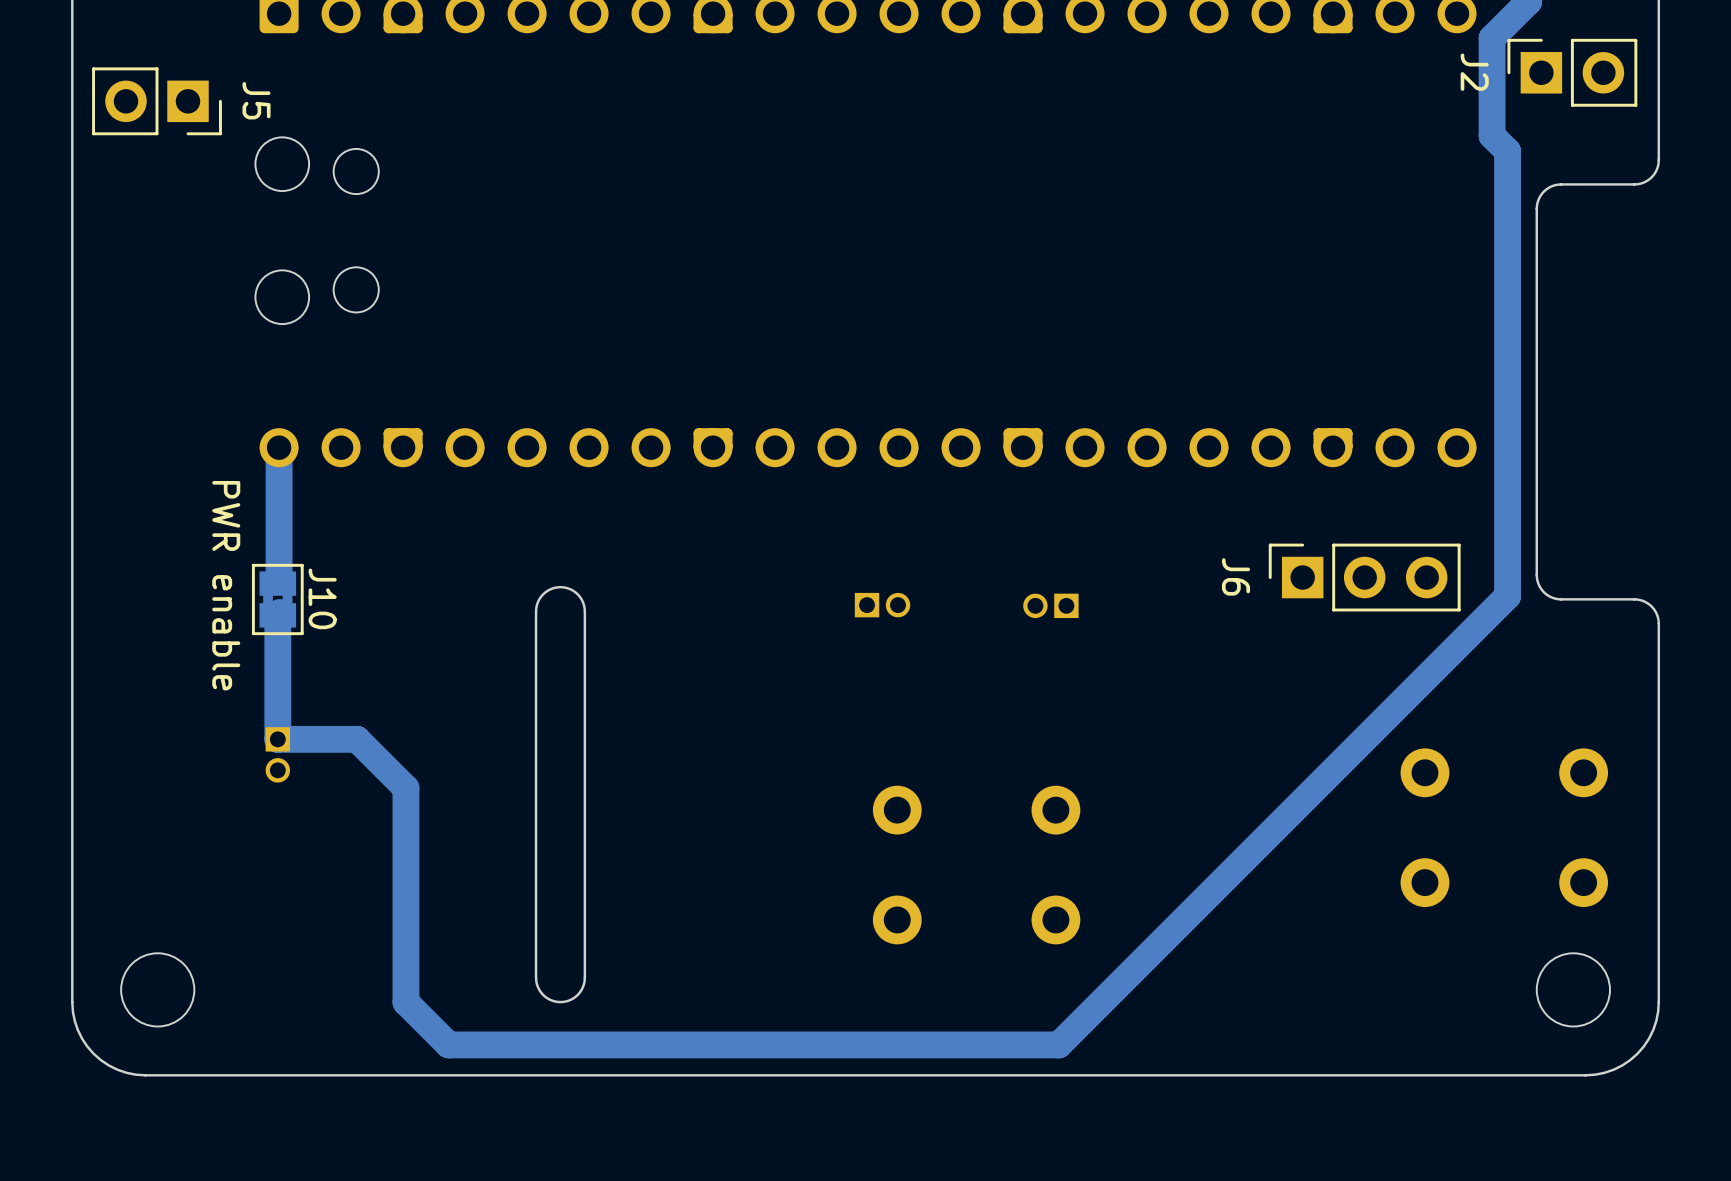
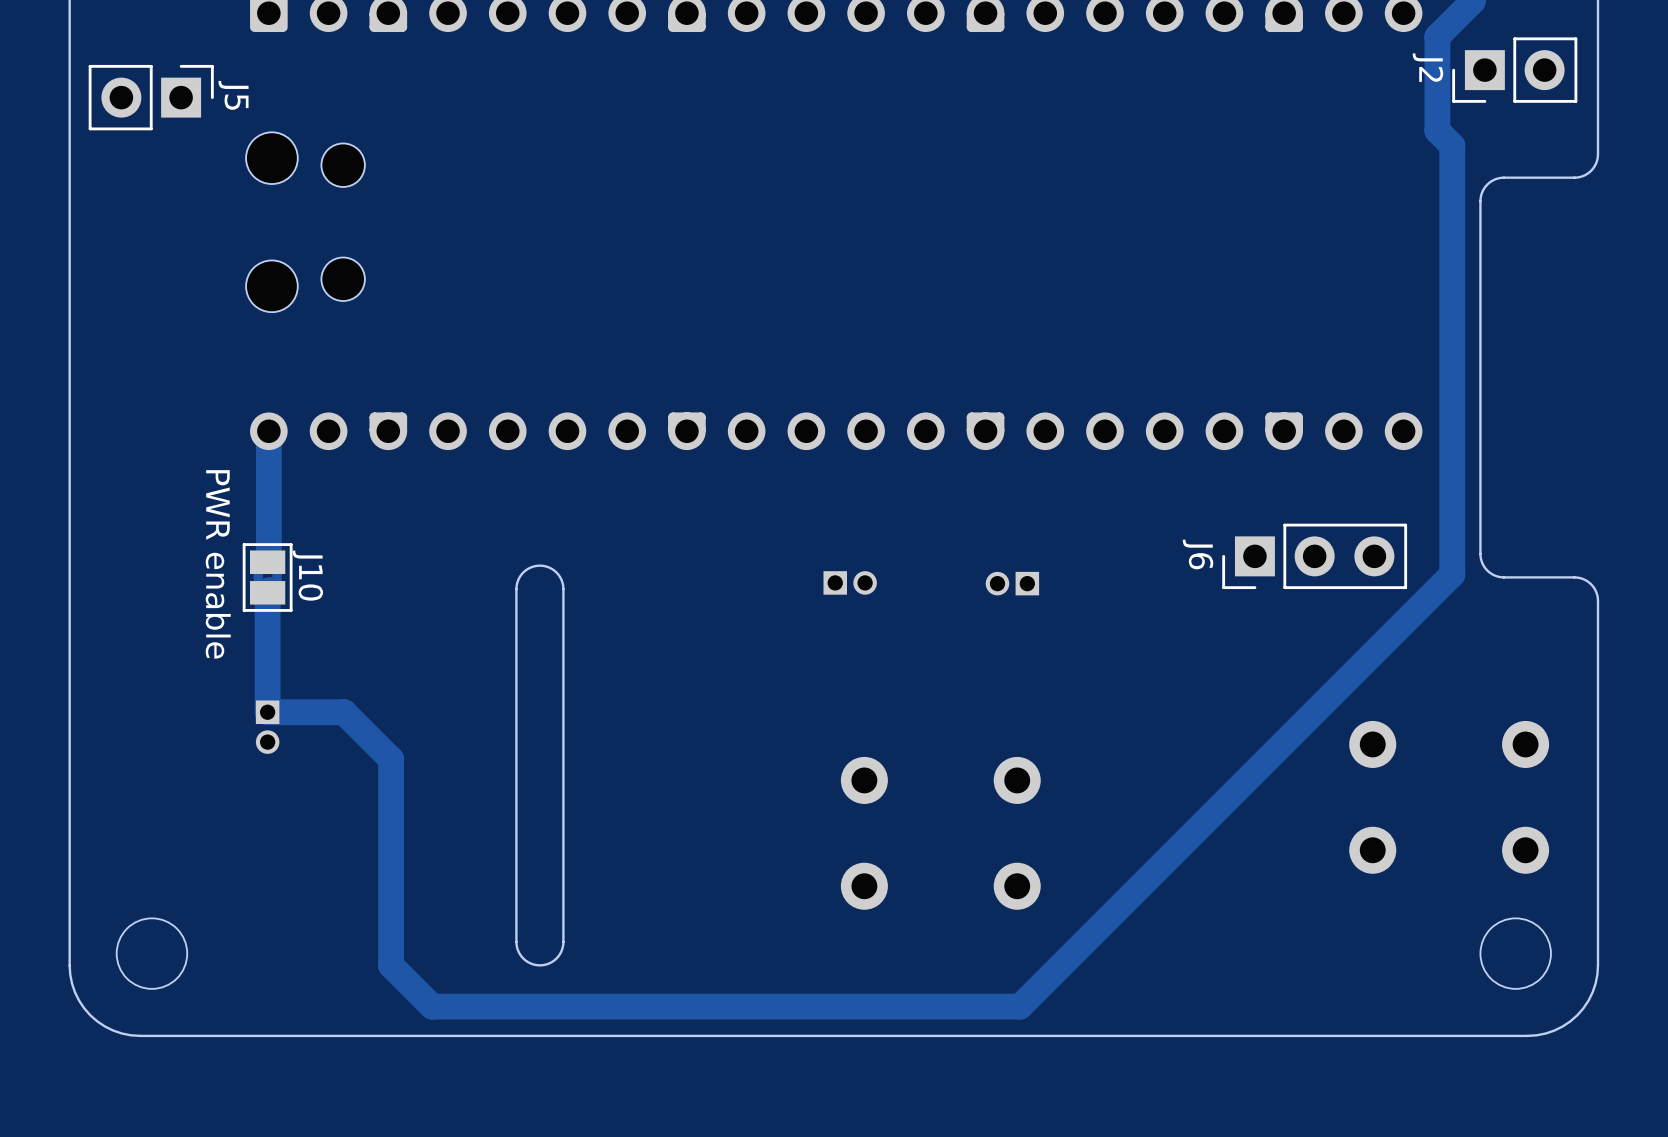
J2 footprint: [1507, 38, 1638, 107] -> [1452, 37, 1578, 103]
J5 footprint: [92, 67, 222, 136] -> [88, 64, 214, 131]
J6 footprint: [1268, 543, 1461, 612] -> [1222, 523, 1408, 590]

